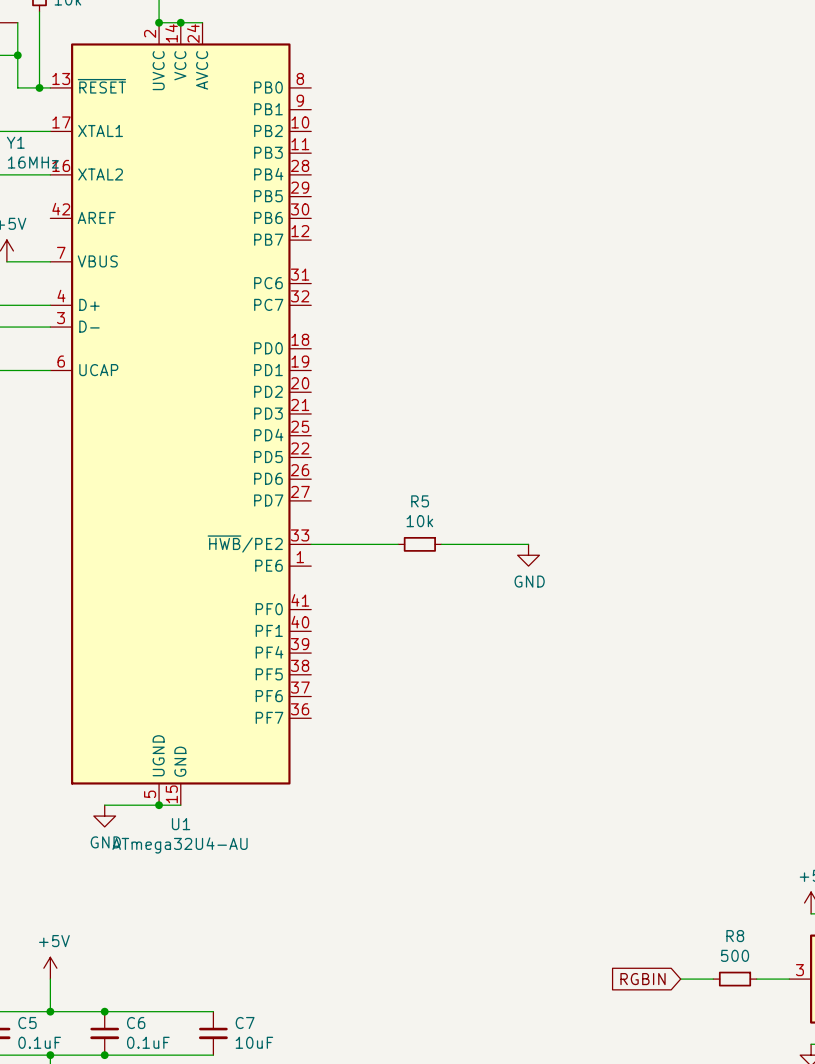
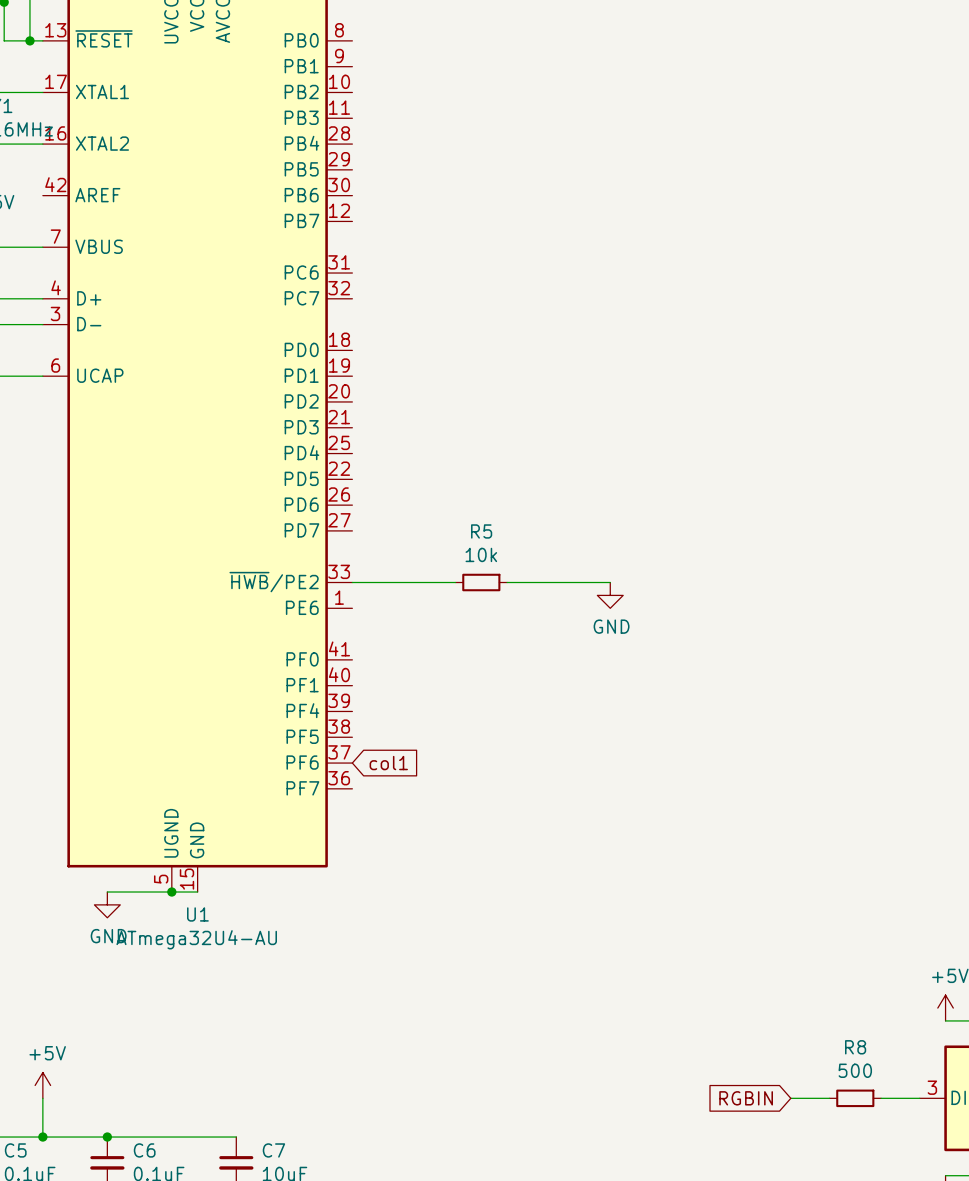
global label: none -> col1 (388, 763)

